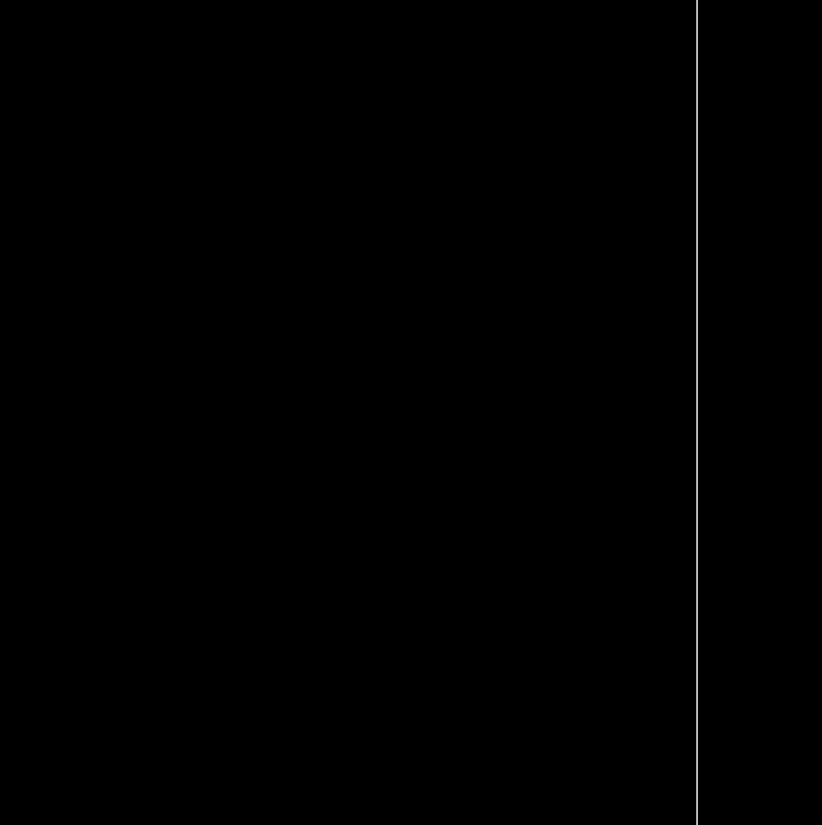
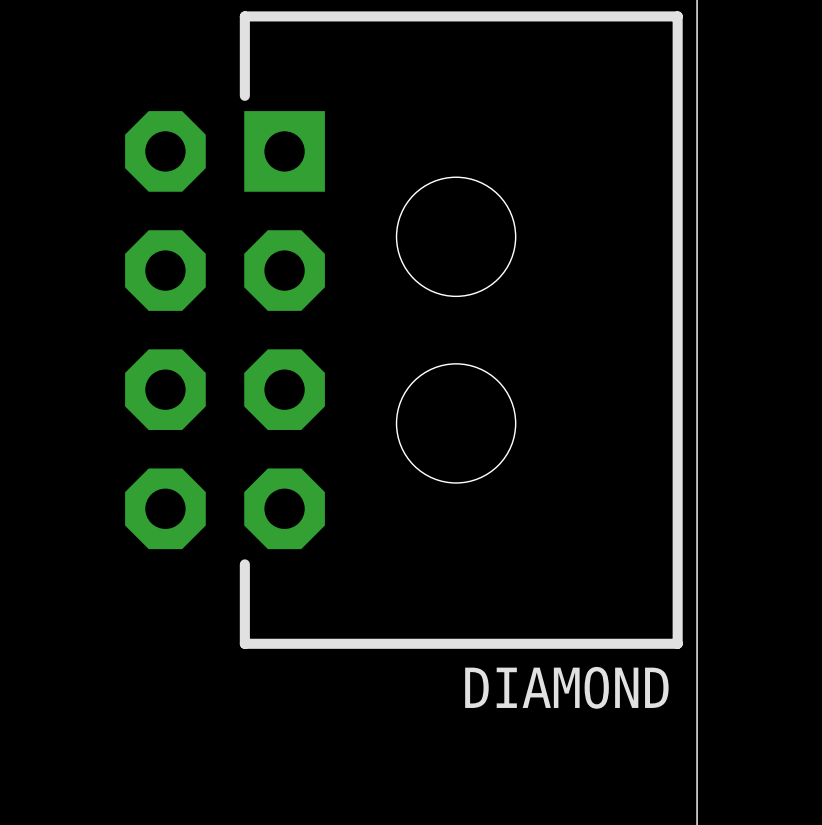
DIAMOND: none -> (403, 330)

